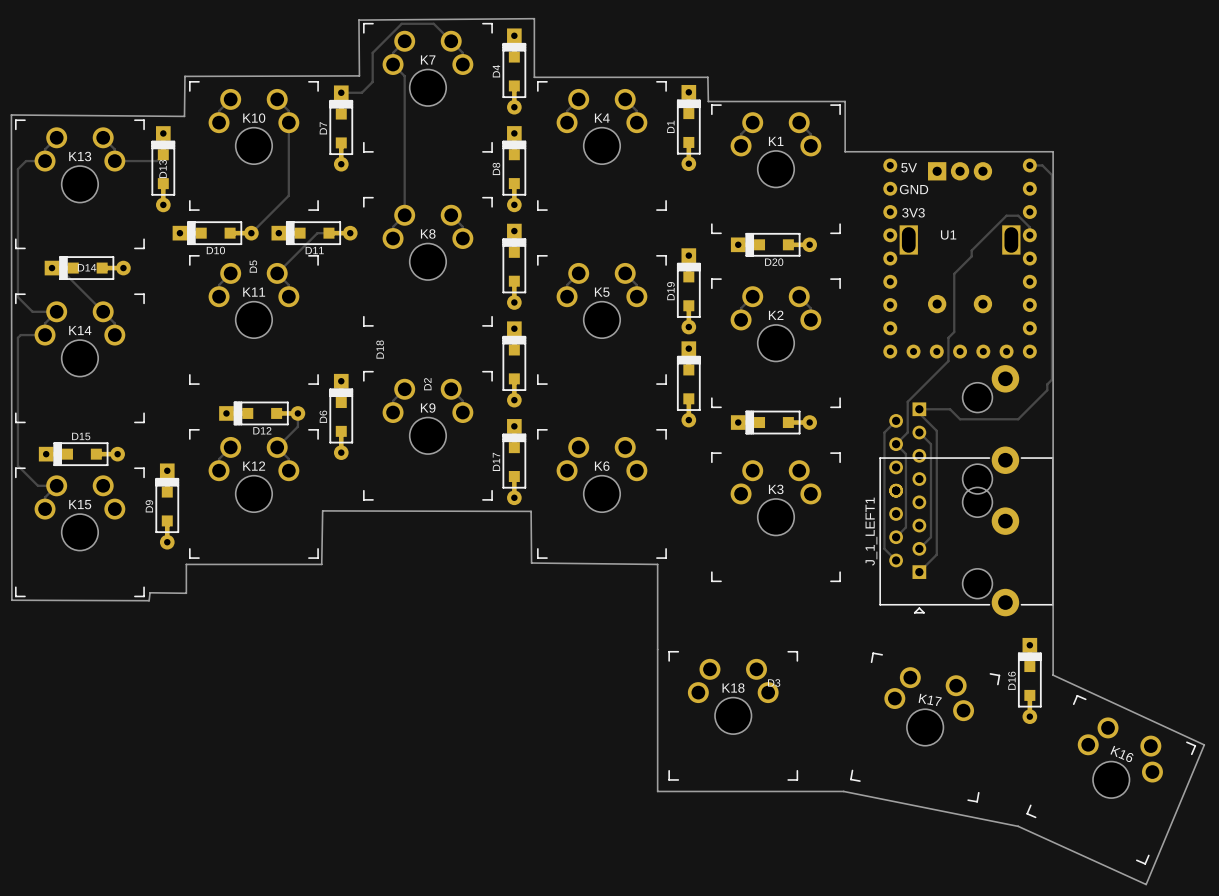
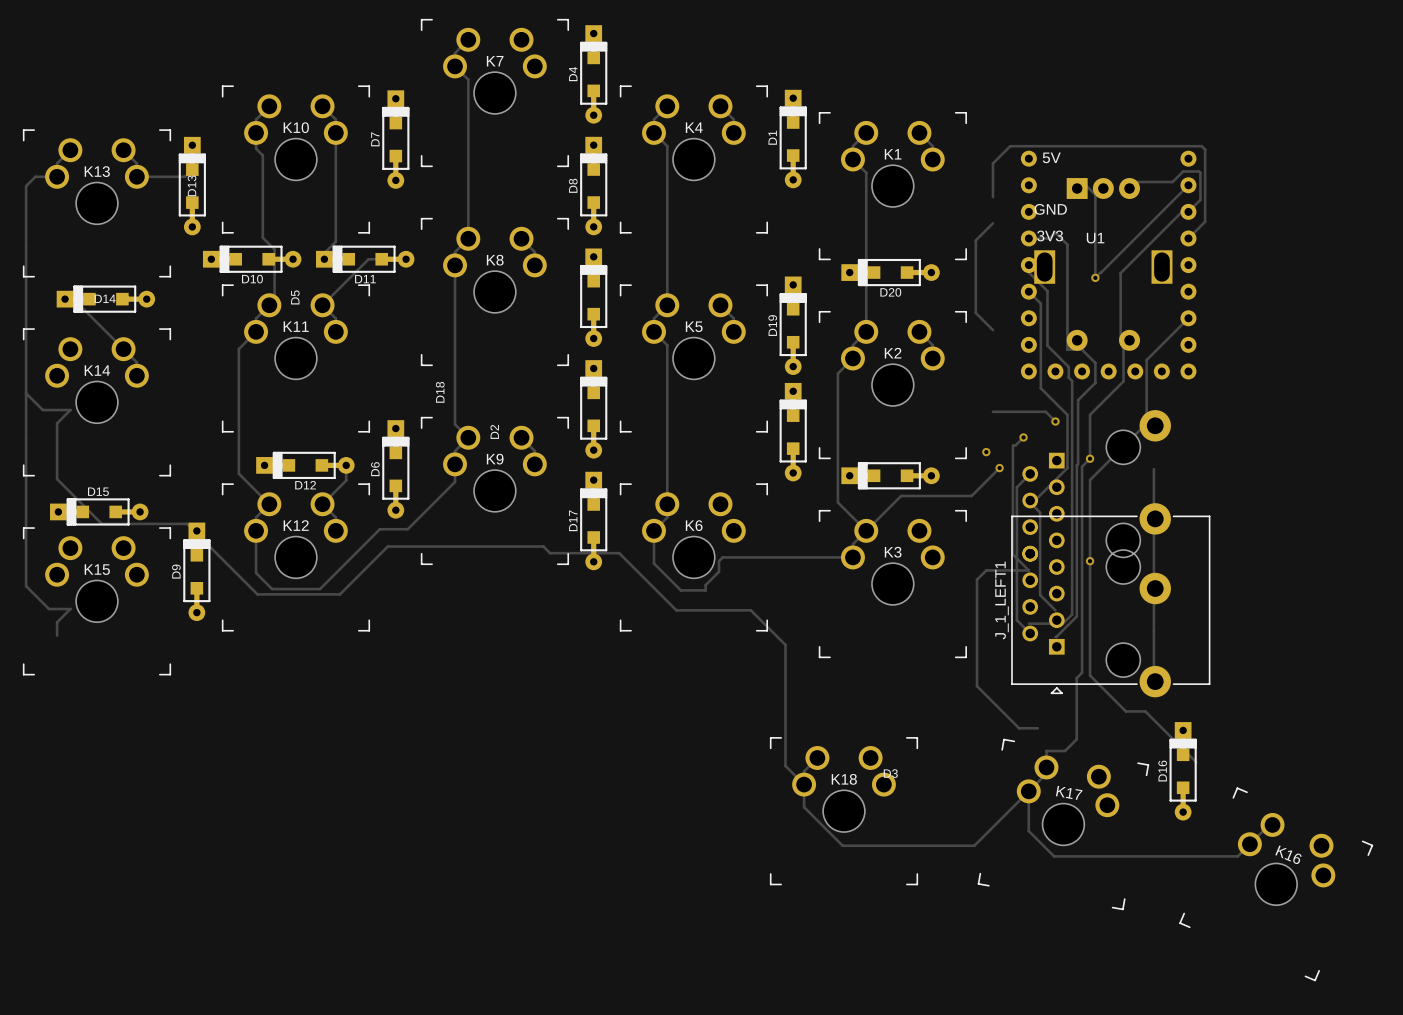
board edge: (534, 18) (358, 20) (359, 75) (184, 76) (184, 116) (11, 114) (11, 600) (149, 600) (150, 592) (186, 593) (186, 564) (321, 564) (322, 510) (531, 511) (531, 563) (657, 564) (657, 791) (843, 791) (1018, 826) (1146, 884) (1204, 744) (1053, 675) (1053, 151) (845, 151) (845, 101) (708, 101) (707, 77) (534, 77) (534, 18) -> none
track: (462, 64) (462, 52) (433, 23) (401, 23) (372, 52) (372, 81) (361, 92) (341, 92) -> none
track: none -> (256, 132) (256, 148) (262, 155) (262, 237) (274, 249) (274, 300) (269, 305)
track: none -> (653, 132) (667, 146) (667, 305)
track: none -> (852, 159) (866, 172) (866, 331)
track: none -> (1082, 182) (1095, 194) (1095, 277) (1188, 185)
track: none -> (1134, 182) (1172, 182) (1183, 171) (1199, 171) (1200, 199) (1188, 211) (1181, 211) (1120, 273) (1120, 340) (1123, 343) (1123, 381) (1090, 414) (1090, 458) (1082, 466) (1082, 672) (1076, 678) (1076, 739) (1065, 751) (1046, 751) (1046, 773) (974, 845) (842, 845) (804, 807) (804, 771) (817, 757)
track: (1029, 165) (1042, 165) (1051, 175) (1051, 379) (1047, 384) (1047, 390) (1018, 419) (960, 419) (950, 409) (919, 409) (919, 413) (936, 430) (936, 554) (919, 572) -> none
text position: 5V (909, 167) -> 5V (1051, 157)
track: none -> (992, 197) (992, 163) (1010, 146) (1201, 146) (1205, 149) (1205, 221) (1188, 238)
track: (288, 195) (251, 233) -> (335, 216) (335, 241) (318, 259)
track: none -> (992, 223) (975, 240) (975, 312) (992, 330)
track: none -> (1028, 238) (1049, 238) (1055, 232) (1067, 244) (1067, 349) (1082, 349) (1095, 362) (1095, 382) (1078, 400) (1076, 616) (1055, 636)
track: (1029, 235) (1029, 227) (1018, 215) (1006, 215) (971, 250) (971, 256) (954, 273) (954, 332) (948, 337) (948, 361) (907, 401) (907, 432) (896, 444) (905, 454) (905, 527) (896, 537) -> none
track: none -> (455, 265) (455, 424) (468, 437)
track: none -> (1028, 265) (1028, 272) (1047, 291) (1047, 345) (1068, 366) (1068, 377) (1072, 381) (1072, 614) (1062, 623) (1028, 623)
via: none -> (1095, 277)
U1 position: (960, 258) -> (1108, 265)
track: none -> (1028, 291) (1040, 303) (1040, 388) (1067, 414) (1067, 468) (1032, 502) (1032, 505) (1040, 512) (1040, 595) (1055, 610)
track: none -> (1188, 318) (1146, 360) (1146, 423) (1090, 480) (1090, 675) (1125, 711) (1145, 711) (1196, 762)
track: none -> (256, 331) (238, 349) (238, 473) (269, 504)
track: none -> (653, 331) (667, 345) (667, 517) (653, 530) (653, 563) (680, 590) (705, 590) (705, 585) (718, 571) (718, 561) (722, 557) (852, 557) (852, 544) (901, 495) (971, 495) (999, 468)
track: (17, 297) (32, 311) (56, 311) (45, 323) (45, 335) (20, 335) (17, 337) -> (26, 332) (26, 378)
track: none -> (852, 358) (837, 373) (837, 502) (866, 530)
track: none -> (26, 393) (42, 410) (70, 410) (57, 423) (57, 479) (101, 523) (187, 523) (257, 594) (339, 594) (387, 546) (543, 546) (550, 553) (619, 553) (676, 610) (750, 610) (785, 644) (785, 765) (804, 784)
track: none -> (992, 411) (1045, 411) (1055, 421)
via: none -> (1055, 421)
track: none -> (1023, 437) (1015, 445) (1012, 445)
via: none -> (1023, 437)
track: none -> (1012, 446) (1012, 554) (1028, 570) (986, 570) (977, 579) (977, 686) (1019, 728) (1037, 728)
via: none -> (986, 452)
via: none -> (1090, 458)
track: none -> (455, 464) (455, 481) (407, 529) (379, 529) (320, 589) (272, 589) (256, 573) (256, 530)
via: none -> (999, 468)
track: none -> (1153, 469) (1153, 671)
track: (919, 432) (930, 444) (930, 537) (919, 548) -> none
track: (17, 465) (37, 485) (56, 485) (45, 497) (45, 509) -> (26, 525) (26, 586) (48, 609) (70, 609) (57, 622) (57, 635)
via: none -> (1090, 561)
track: none -> (1028, 791) (1028, 831) (1054, 856) (1237, 856) (1269, 824) (1272, 824)

